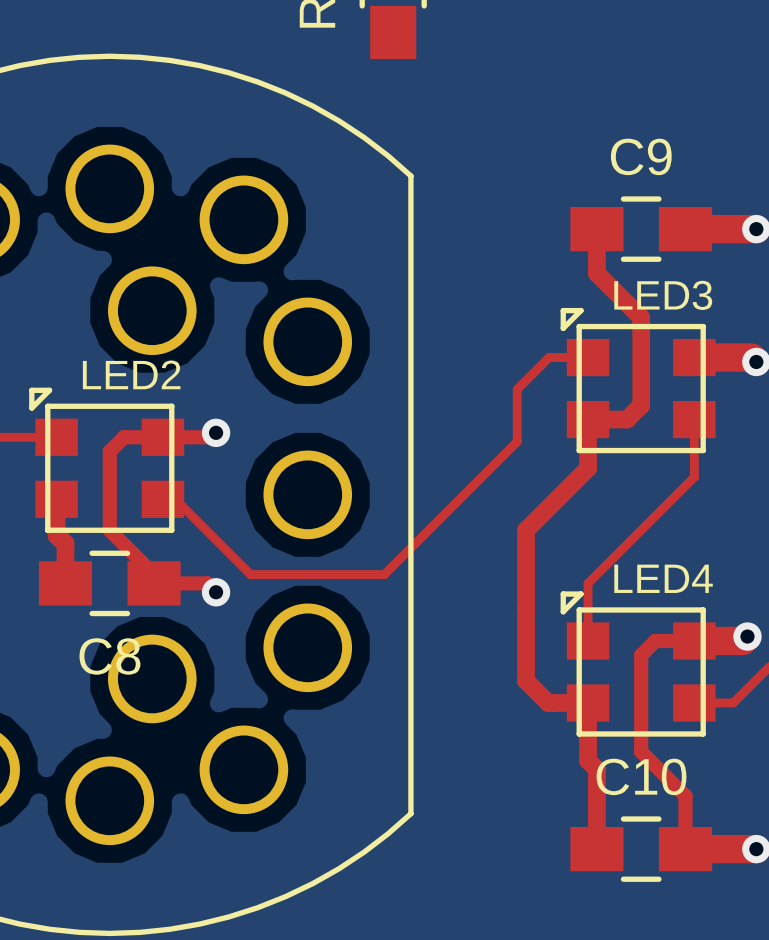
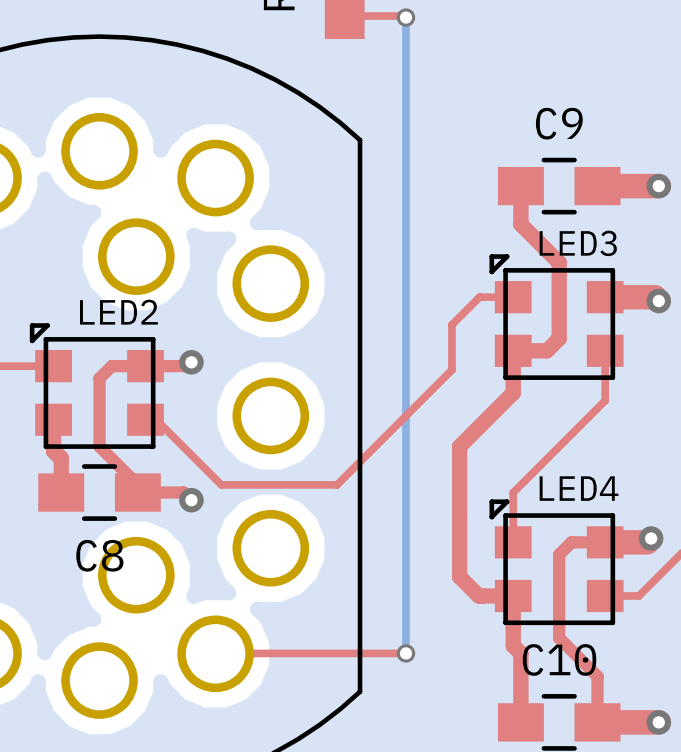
top track: none -> (344, 16) (405, 17)
bottom track: none -> (405, 17) (405, 653)
via: none -> (405, 17)
top track: none -> (215, 653) (405, 653)
via: none -> (405, 653)

